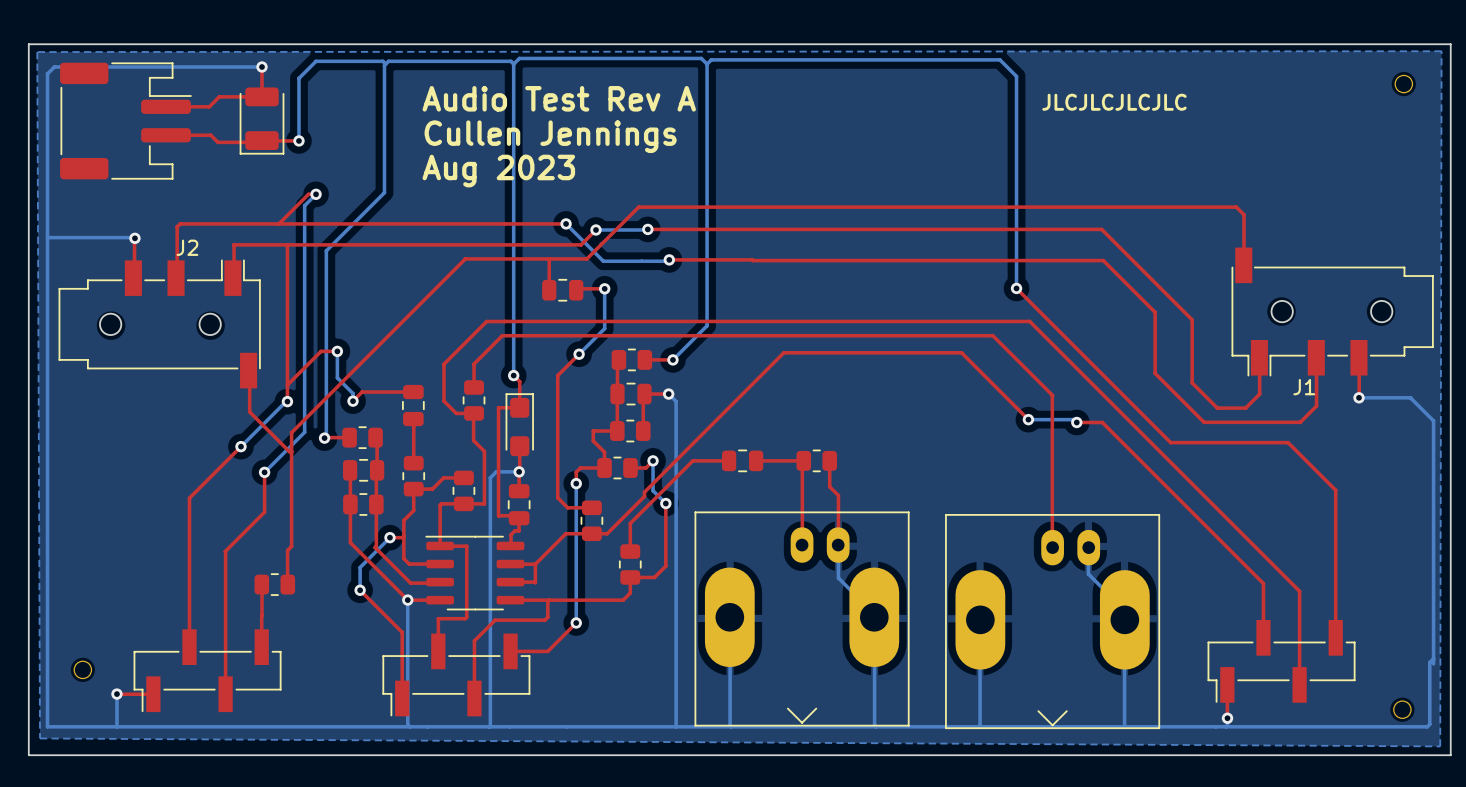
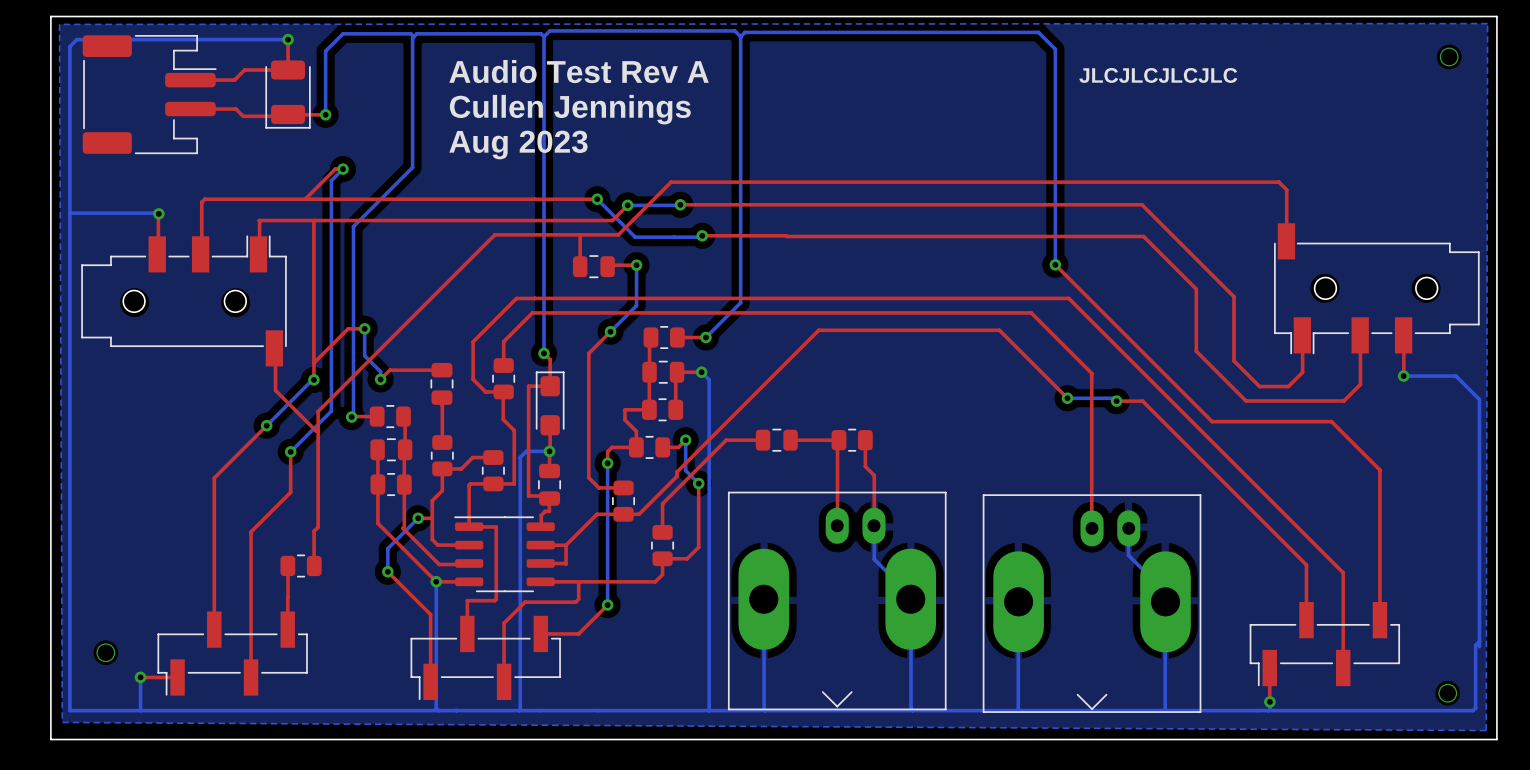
J2 name: J2 (187, 247) -> none
J1 name: J1 (1304, 387) -> none

